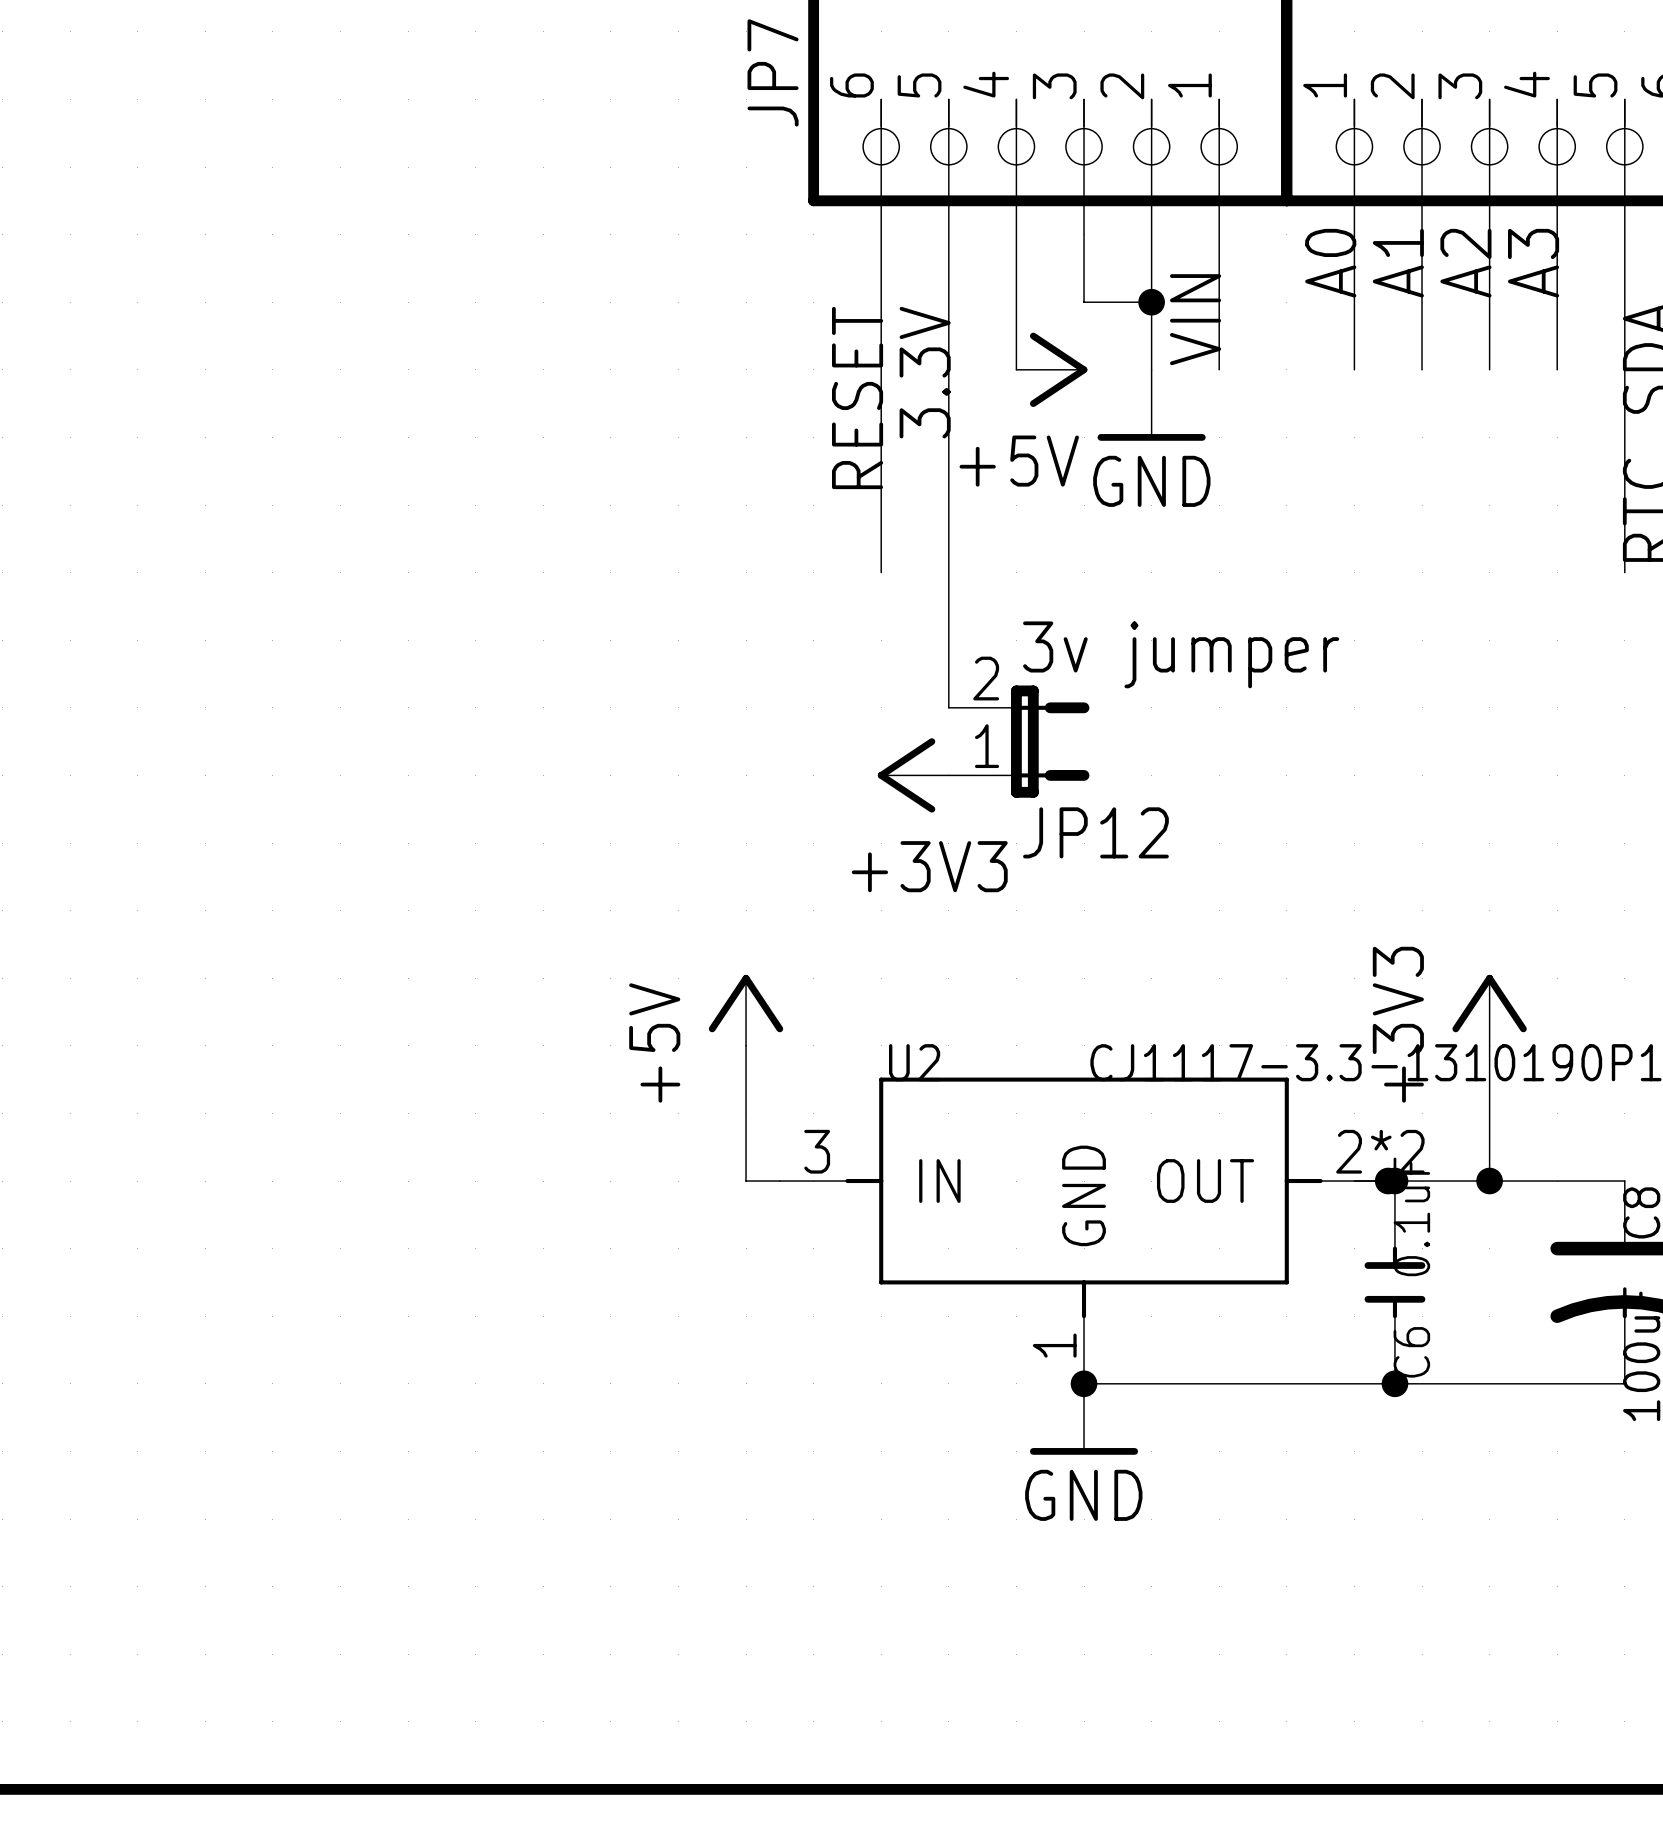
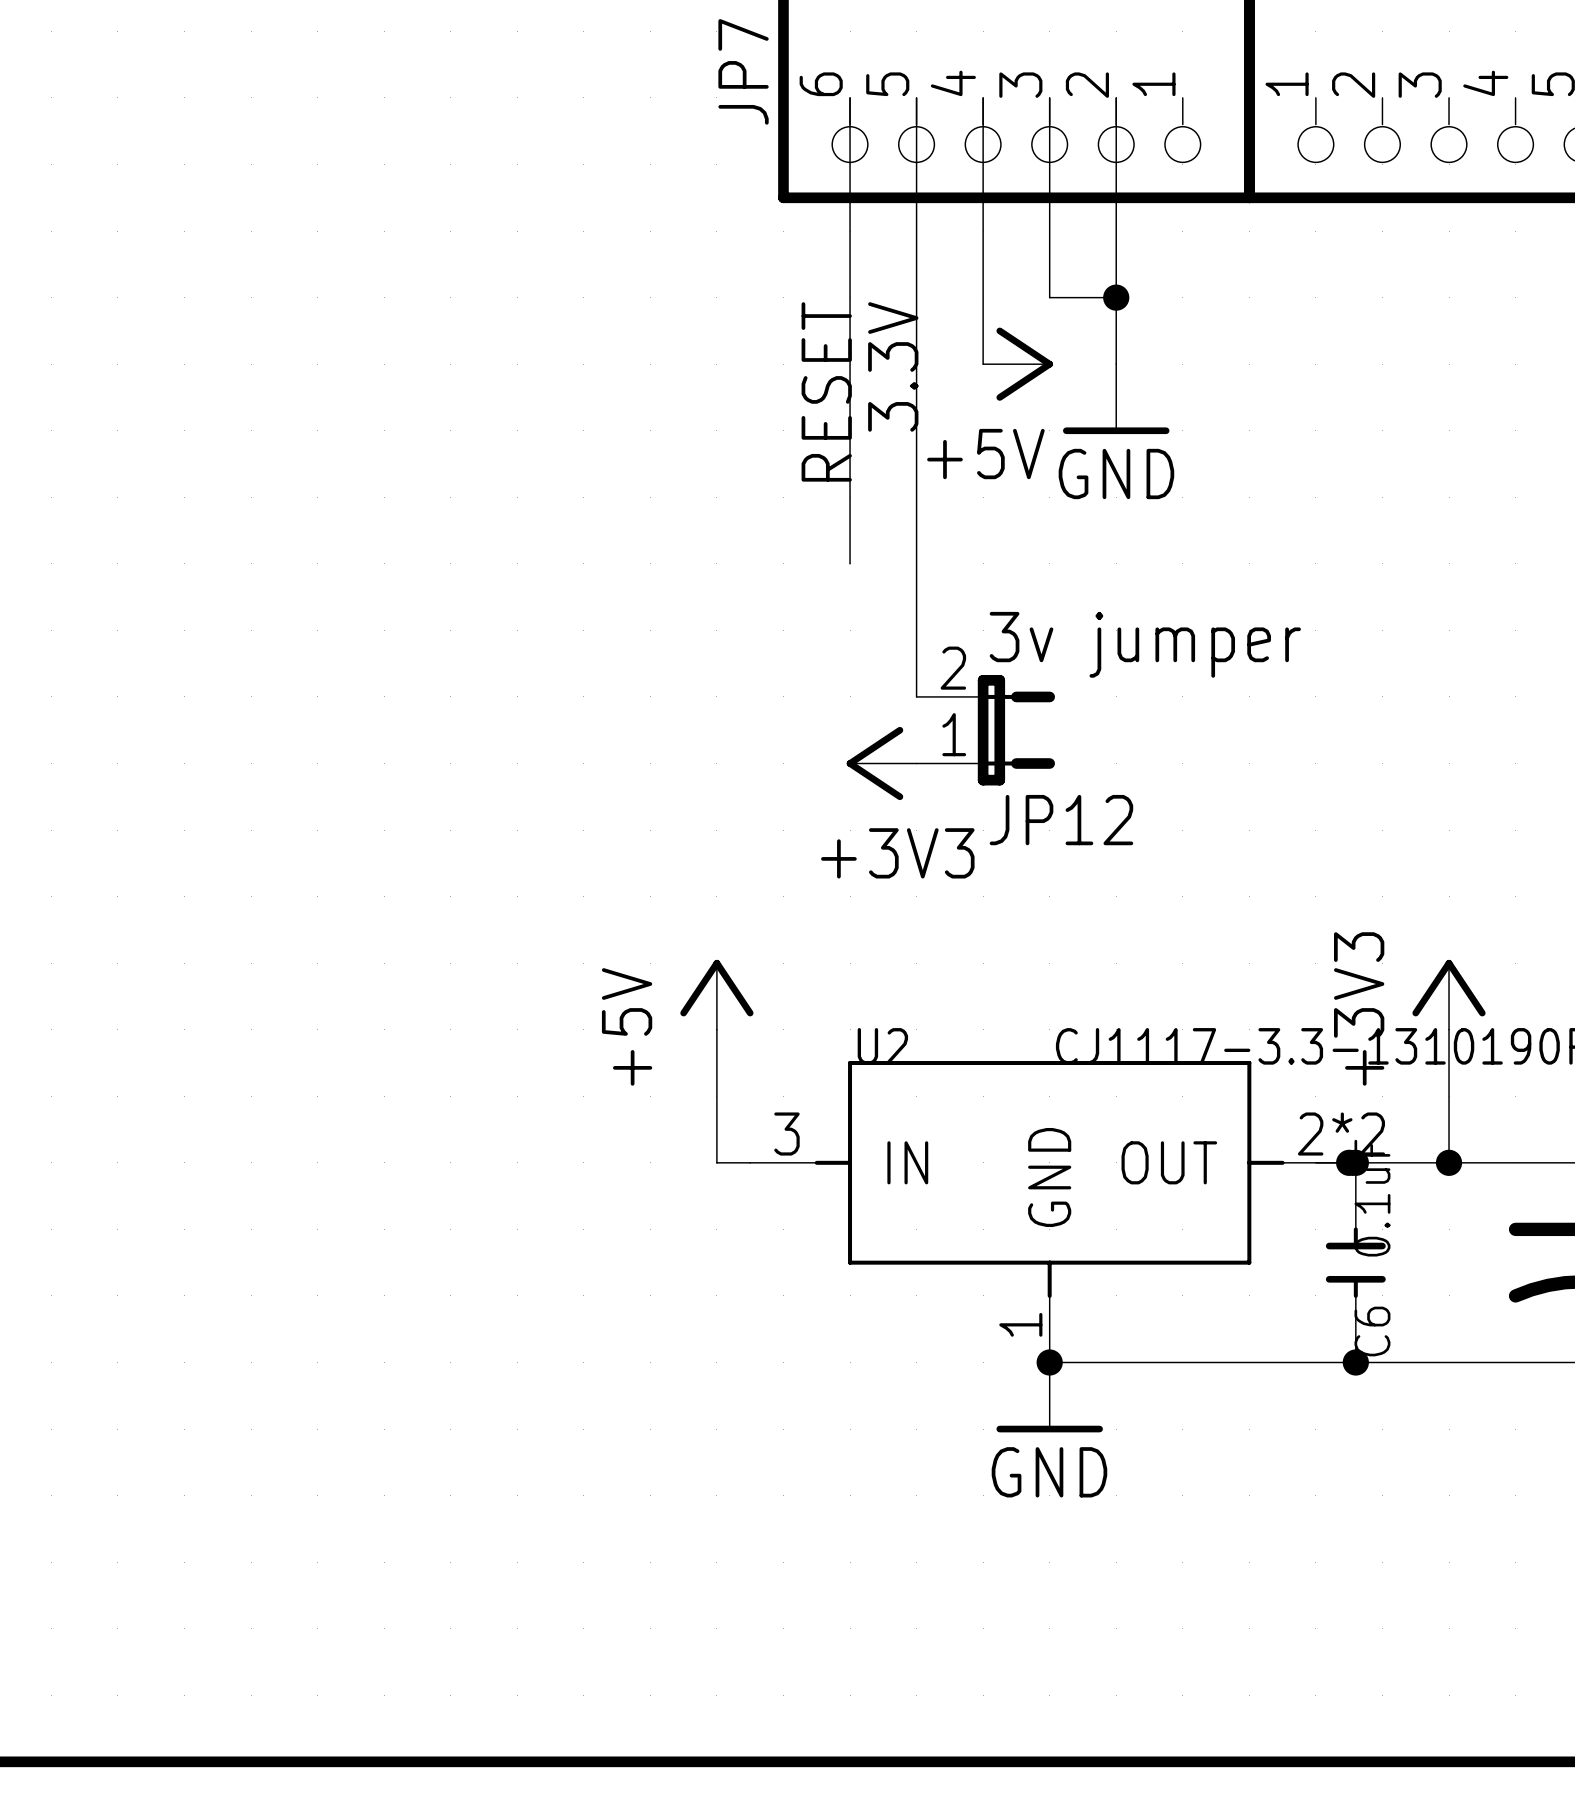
wire: (1219, 99) (1219, 369) -> none
wire: (1354, 99) (1354, 369) -> none
wire: (1422, 99) (1422, 369) -> none
wire: (1489, 99) (1489, 369) -> none
wire: (1557, 99) (1557, 369) -> none
label: A0 (1330, 263) -> none
label: A1 (1398, 263) -> none
label: A2 (1465, 263) -> none
label: A3 (1533, 263) -> none
label: VIN (1195, 319) -> none

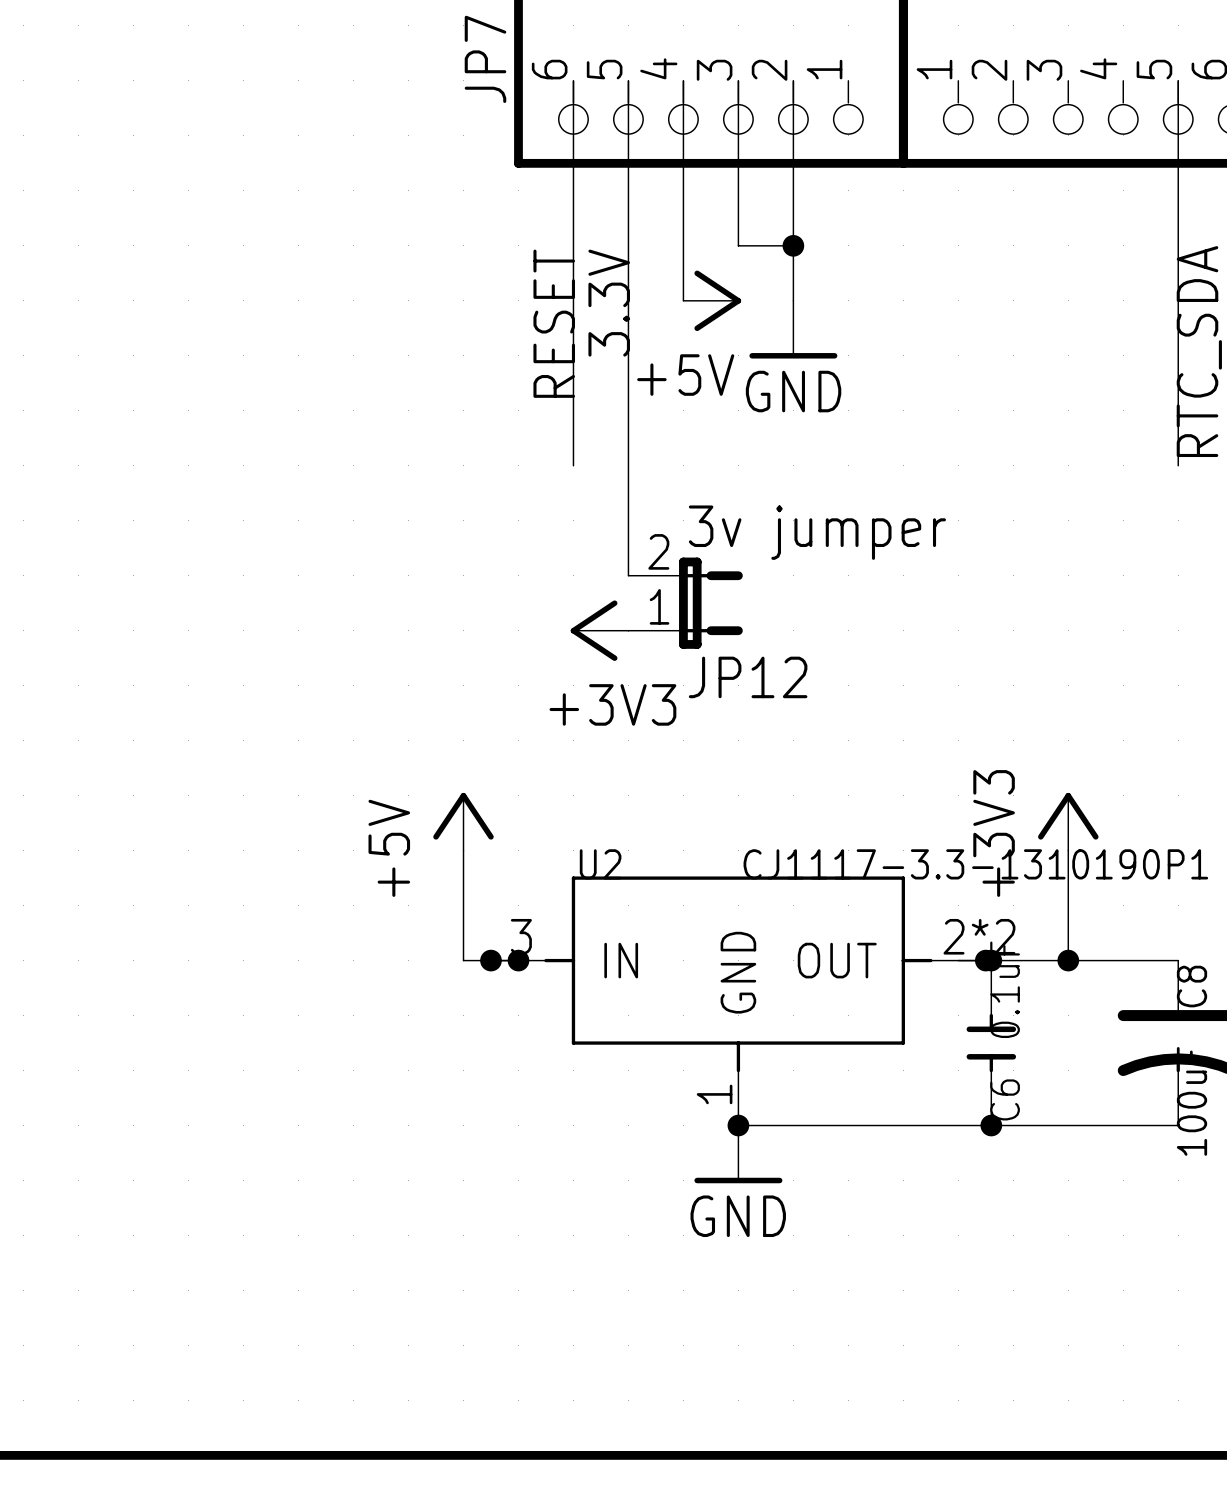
junction: none -> (490, 960)
junction: none -> (518, 960)

